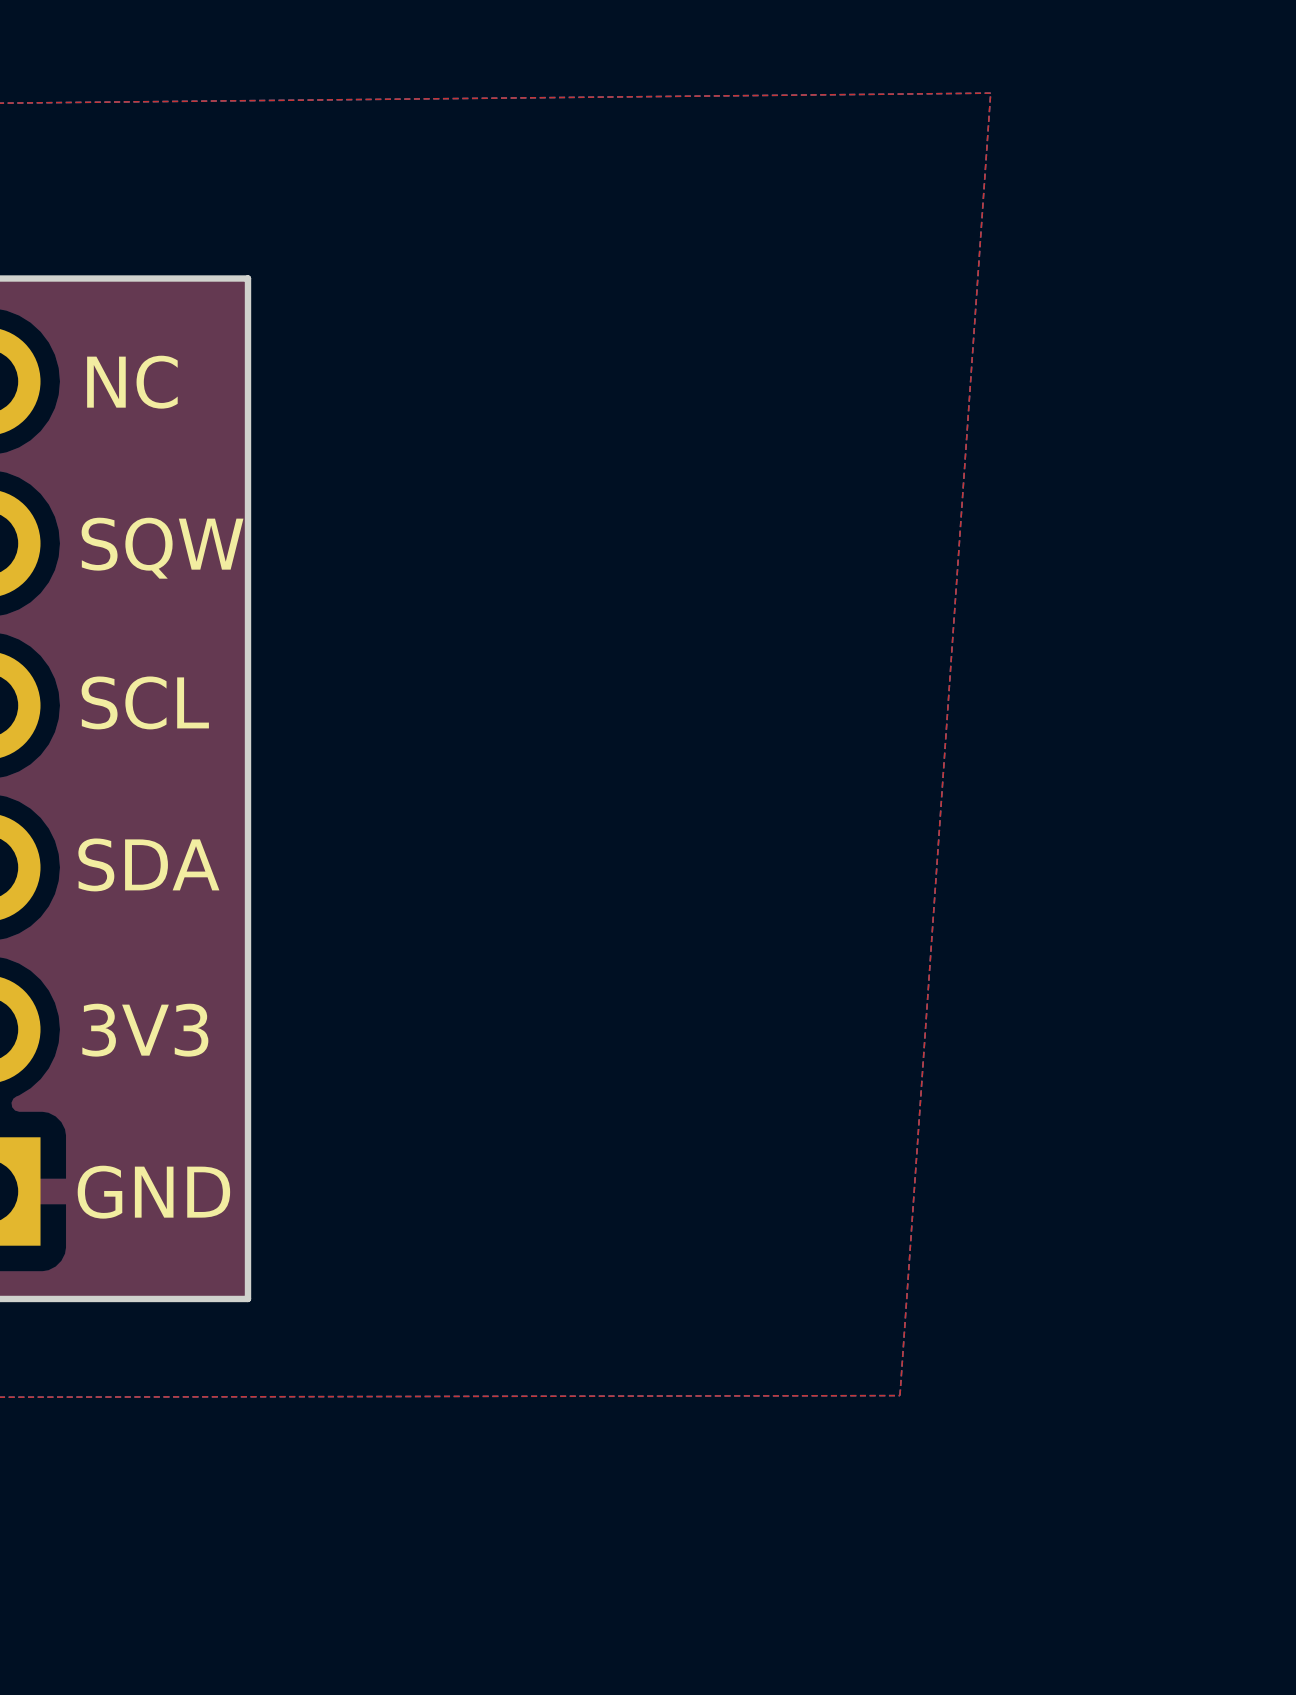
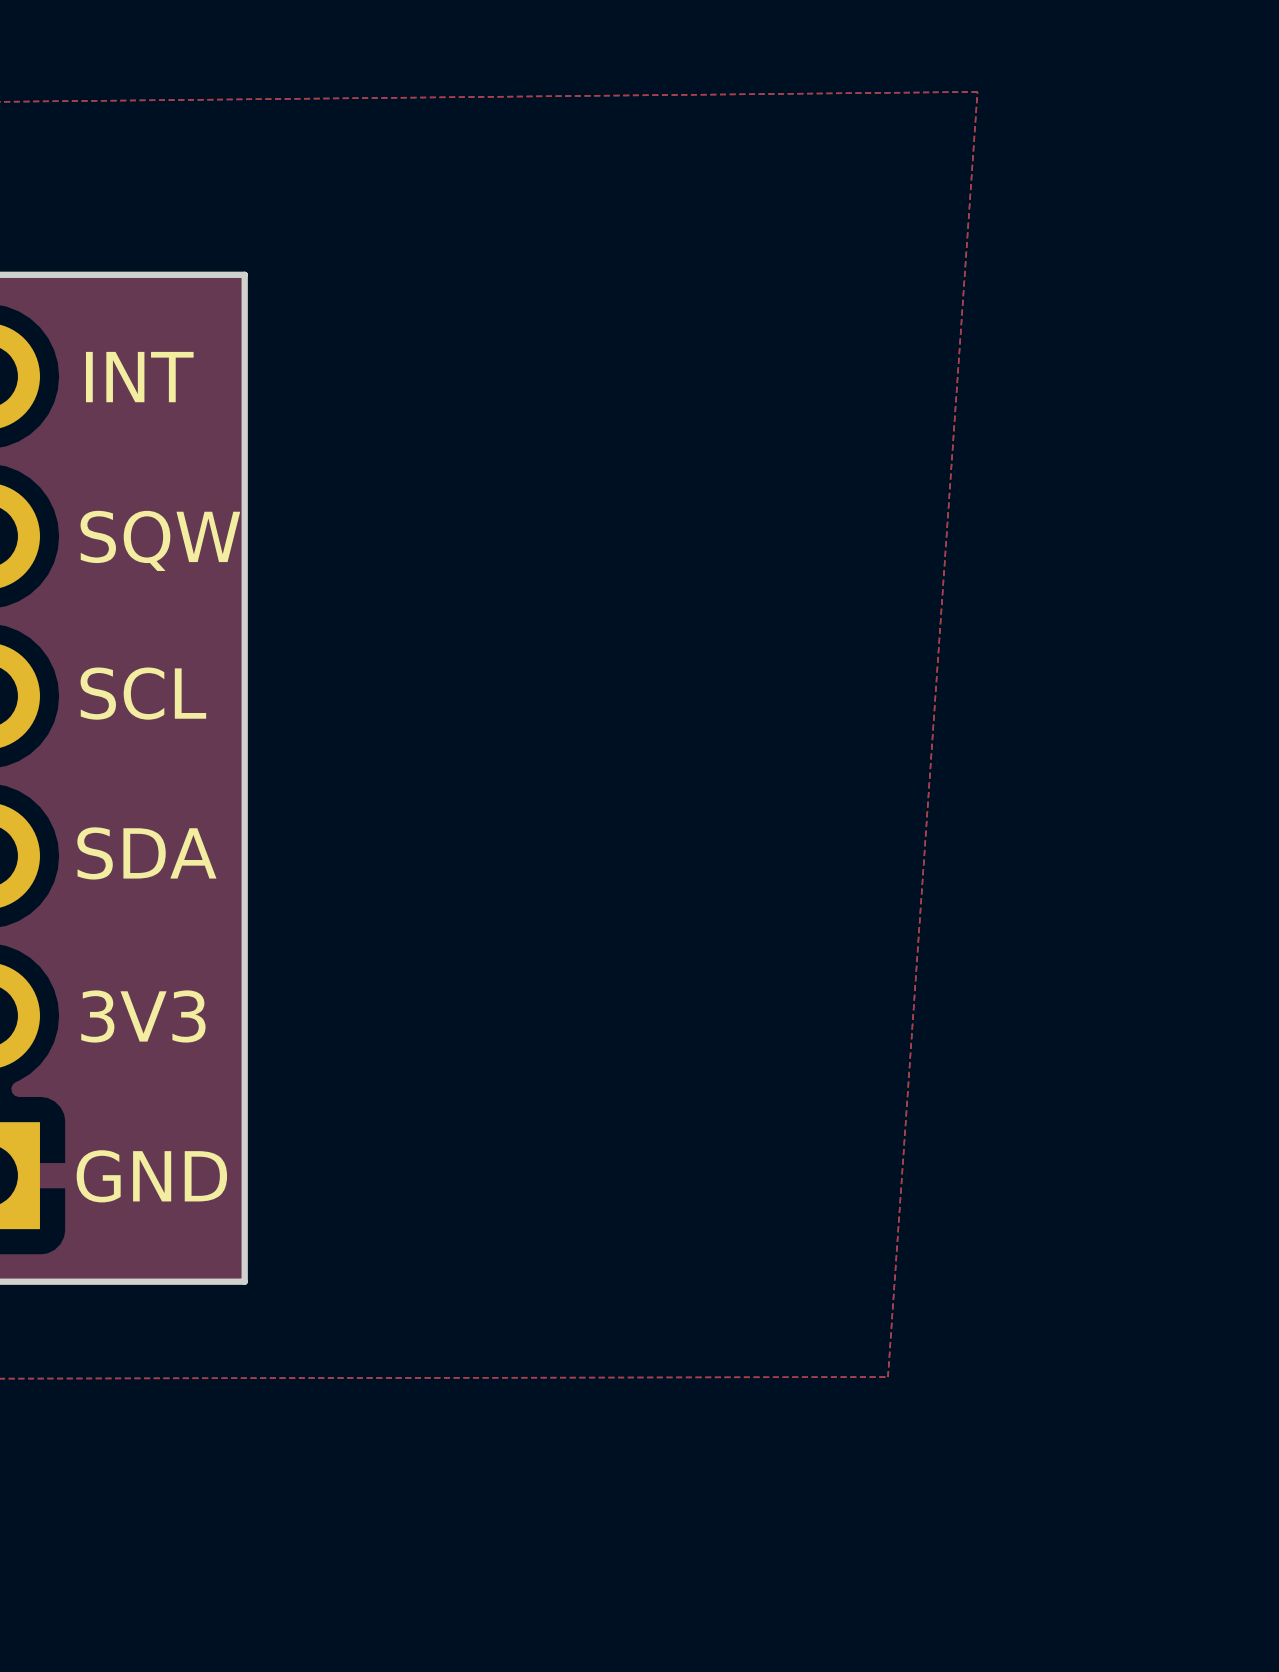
text: NC (132, 382) -> INT (139, 377)

